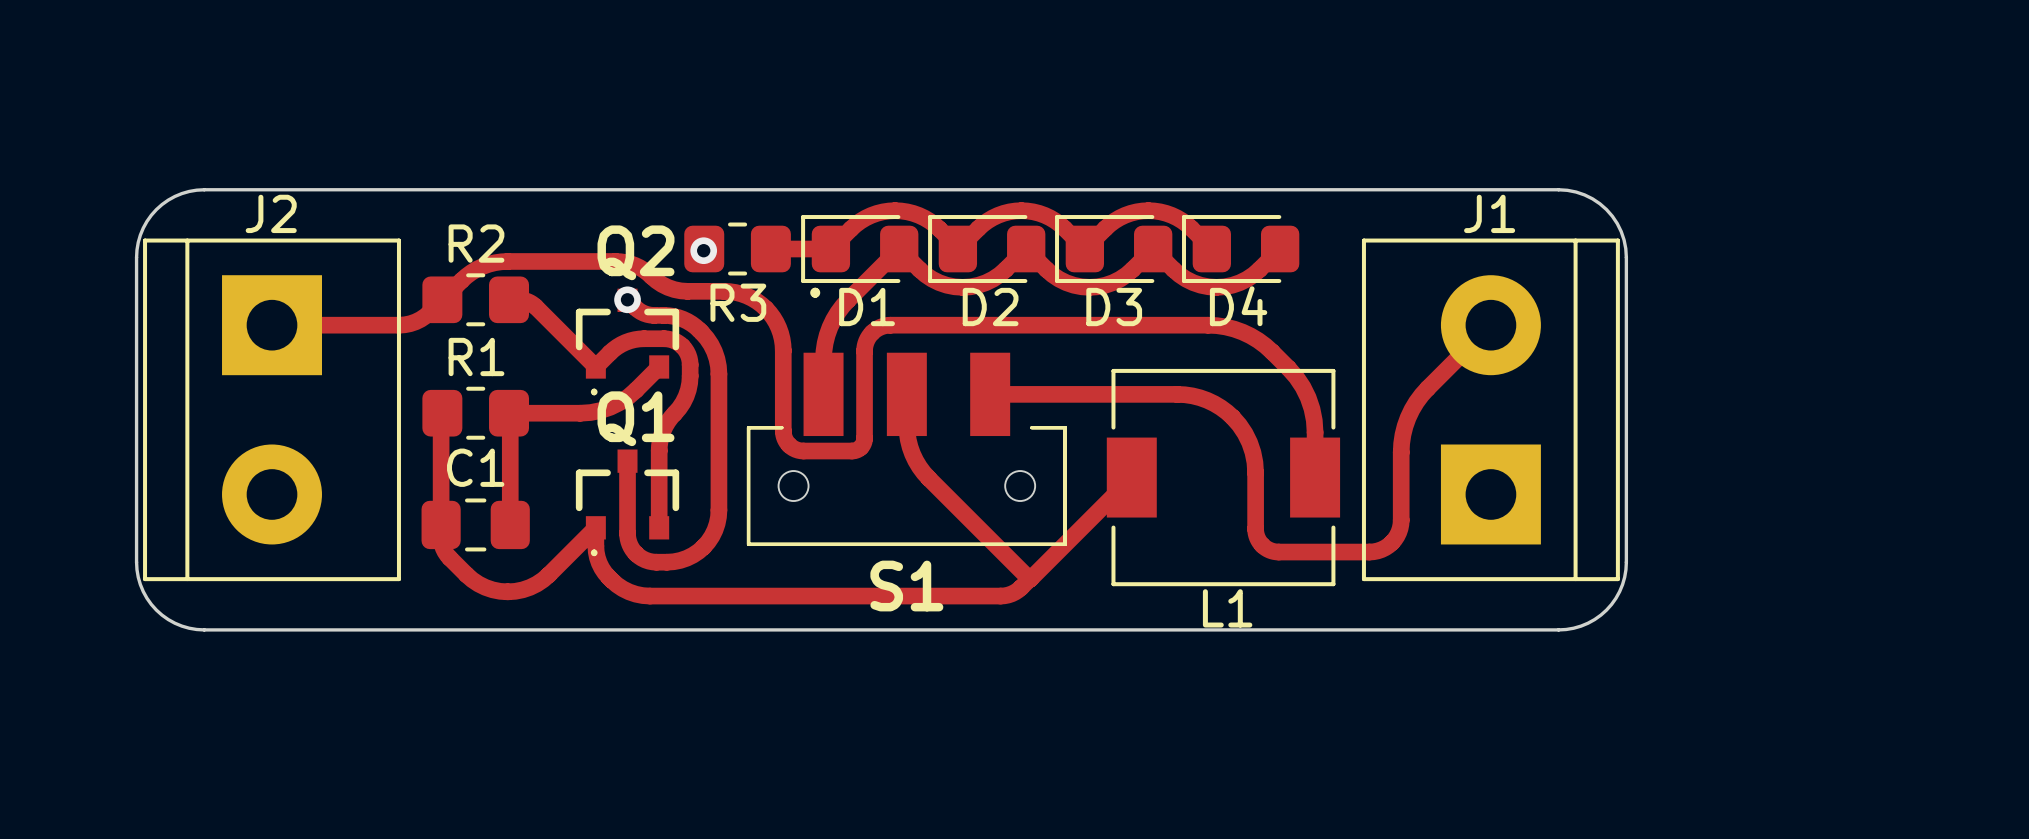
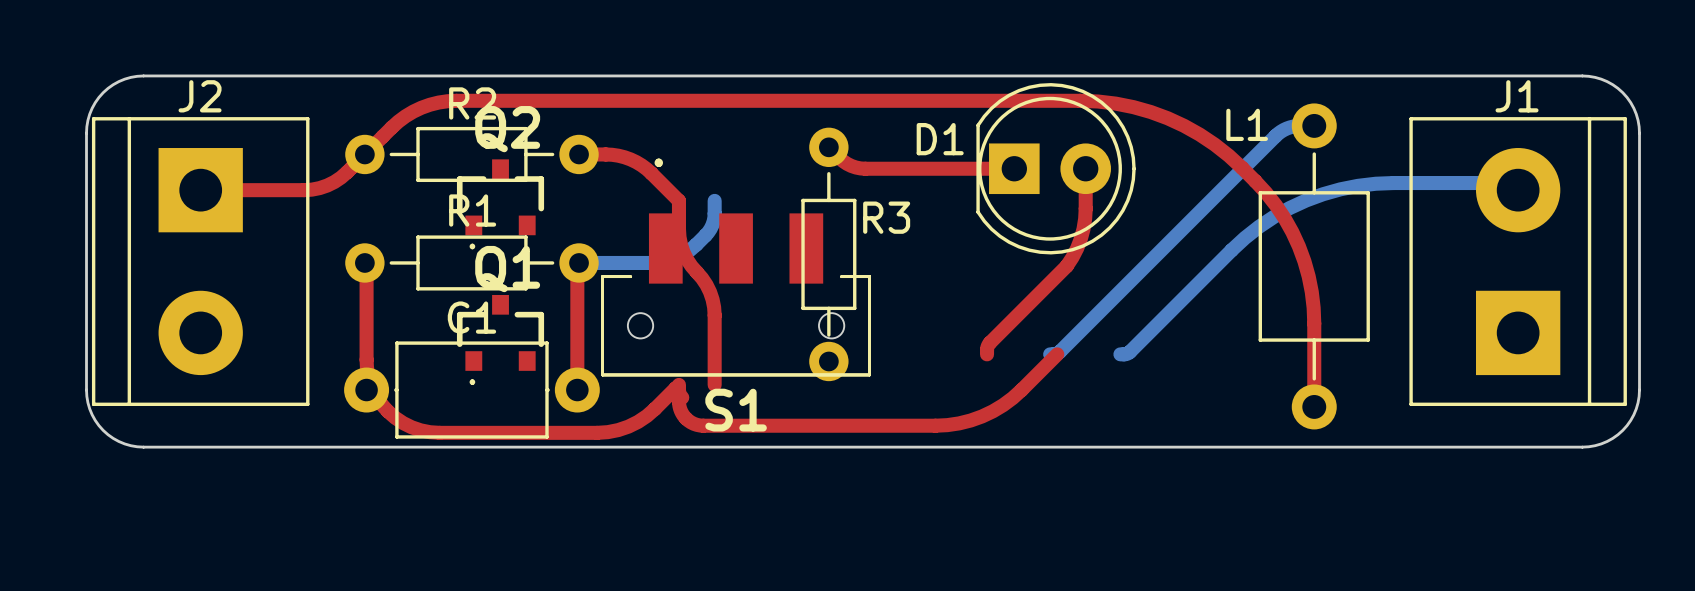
board edge: (1558, 189) (1584, 194) (1606, 209) (1621, 231) (1626, 257) (1626, 562) (1624, 577) (1615, 598) (1600, 615) (1581, 626) (1558, 629) -> (1285, 75) (1588, 76) (1607, 81) (1622, 92) (1633, 108) (1639, 133) (1639, 396) (1630, 420) (1618, 434) (1601, 443) (1582, 447) (1285, 447)
D1 footprint: [801, 215, 919, 284] -> [976, 83, 1136, 255]
R3 footprint: [684, 222, 791, 276] -> [801, 127, 857, 382]
top track: (1084, 248) (1055, 220) (1033, 211) (1009, 211) (992, 217) (982, 224) (958, 248) (929, 221) (913, 213) (895, 210) (876, 213) (865, 218) (855, 224) (830, 249) (770, 249) -> none
top track: (1084, 248) (1114, 220) (1130, 213) (1148, 210) (1166, 213) (1182, 220) (1211, 248) -> none
top track: (899, 249) (932, 279) (946, 285) (962, 287) (978, 285) (993, 279) (1026, 249) -> none
top track: (899, 249) (848, 300) (833, 319) (827, 335) (823, 351) (823, 394) -> none
D2: (986, 249) -> none
top track: (1026, 249) (1059, 279) (1073, 285) (1089, 287) (1105, 285) (1120, 279) (1153, 249) -> none
D3: (1113, 249) -> none
top track: (1153, 249) (1186, 279) (1200, 285) (1216, 287) (1232, 285) (1247, 279) (1280, 249) -> none
D4: (1240, 249) -> none
bottom track: none -> (1314, 125) (1293, 126) (1278, 133) (1059, 351) (1050, 354)
via: (703, 250) -> none
R2 footprint: [422, 273, 530, 327] -> [345, 126, 599, 183]
top track: none -> (828, 147) (847, 163) (860, 168) (1014, 168)
top track: none -> (579, 154) (612, 154) (630, 159) (646, 169) (678, 200) (681, 244) (687, 259) (706, 284) (714, 307) (714, 384)
top track: (509, 299) (523, 300) (533, 305) (595, 366) (617, 346) (634, 339) (670, 339) (679, 344) (686, 351) (690, 364) (688, 389) (683, 402) (665, 425) (660, 440) (659, 527) -> none
top track: (627, 299) (643, 313) (673, 316) (691, 323) (706, 338) (716, 358) (718, 374) (718, 516) (711, 536) (698, 551) (686, 558) (666, 562) (648, 561) (634, 551) (627, 536) (627, 461) -> none
via: (627, 299) -> none
top track: none -> (1085, 168) (1085, 218) (1080, 238) (1072, 257) (1066, 266) (990, 342) (987, 354)
R3 name position: R3 (738, 302) -> R3 (886, 217)
D1 name position: D1 (867, 307) -> D1 (940, 139)
bottom track: none -> (1518, 183) (1375, 183) (1340, 189) (1306, 200) (1274, 216) (1244, 237) (1130, 351) (1120, 354)
top track: (394, 325) (410, 323) (420, 319) (471, 272) (482, 266) (501, 261) (620, 261) (639, 267) (662, 284) (674, 289) (729, 291) (741, 293) (761, 304) (773, 317) (778, 327) (783, 350) (783, 434) (791, 446) (803, 451) (853, 450) (862, 444) (864, 438) (865, 346) (870, 334) (883, 326) (1207, 325) (1225, 326) (1242, 332) (1265, 345) (1288, 368) (1302, 387) (1308, 397) (1314, 420) (1315, 477) -> (303, 190) (319, 188) (341, 177) (405, 116) (421, 107) (447, 101) (1079, 100) (1133, 107) (1184, 125) (1214, 144) (1255, 181) (1284, 218) (1304, 261) (1311, 292) (1314, 323) (1314, 406)
top track: (1490, 325) (1427, 388) (1411, 409) (1405, 426) (1401, 443) (1400, 528) (1391, 542) (1385, 547) (1373, 551) (1276, 551) (1262, 545) (1255, 531) (1254, 462) (1249, 442) (1232, 417) (1220, 407) (1207, 400) (1192, 395) (1177, 394) (990, 394) -> none
bottom track: none -> (714, 200) (713, 221) (708, 232) (690, 250) (676, 258) (652, 262) (579, 262)
top track: (659, 366) (628, 396) (600, 410) (580, 413) (509, 413) (510, 524) -> none
L1 footprint: [1106, 368, 1341, 587] -> [1258, 103, 1370, 430]
R1 footprint: [422, 386, 530, 440] -> [345, 235, 599, 291]
top track: (906, 394) (908, 439) (919, 466) (1029, 578) -> none
J1 position: (1490, 409) -> (1518, 261)
top track: none -> (364, 262) (366, 265) (366, 359) (369, 380) (383, 406) (395, 417) (411, 427) (439, 432) (607, 432) (638, 421) (654, 408) (676, 387) (678, 388) (682, 397)
top track: none -> (579, 262) (577, 265) (577, 390)
top track: (442, 413) (442, 544) (447, 555) (466, 574) (478, 584) (492, 589) (515, 591) (536, 584) (548, 574) (595, 527) (597, 557) (604, 572) (622, 588) (642, 595) (1000, 596) (1015, 592) (1029, 579) -> none
top track: (1136, 472) (1030, 579) -> none
C1 footprint: [421, 498, 530, 552] -> [344, 341, 600, 439]
top track: none -> (1057, 354) (1021, 390) (1003, 405) (982, 416) (947, 425) (700, 425) (688, 420) (681, 412) (679, 403) (678, 384)
L1 name position: L1 (1227, 608) -> L1 (1247, 124)

